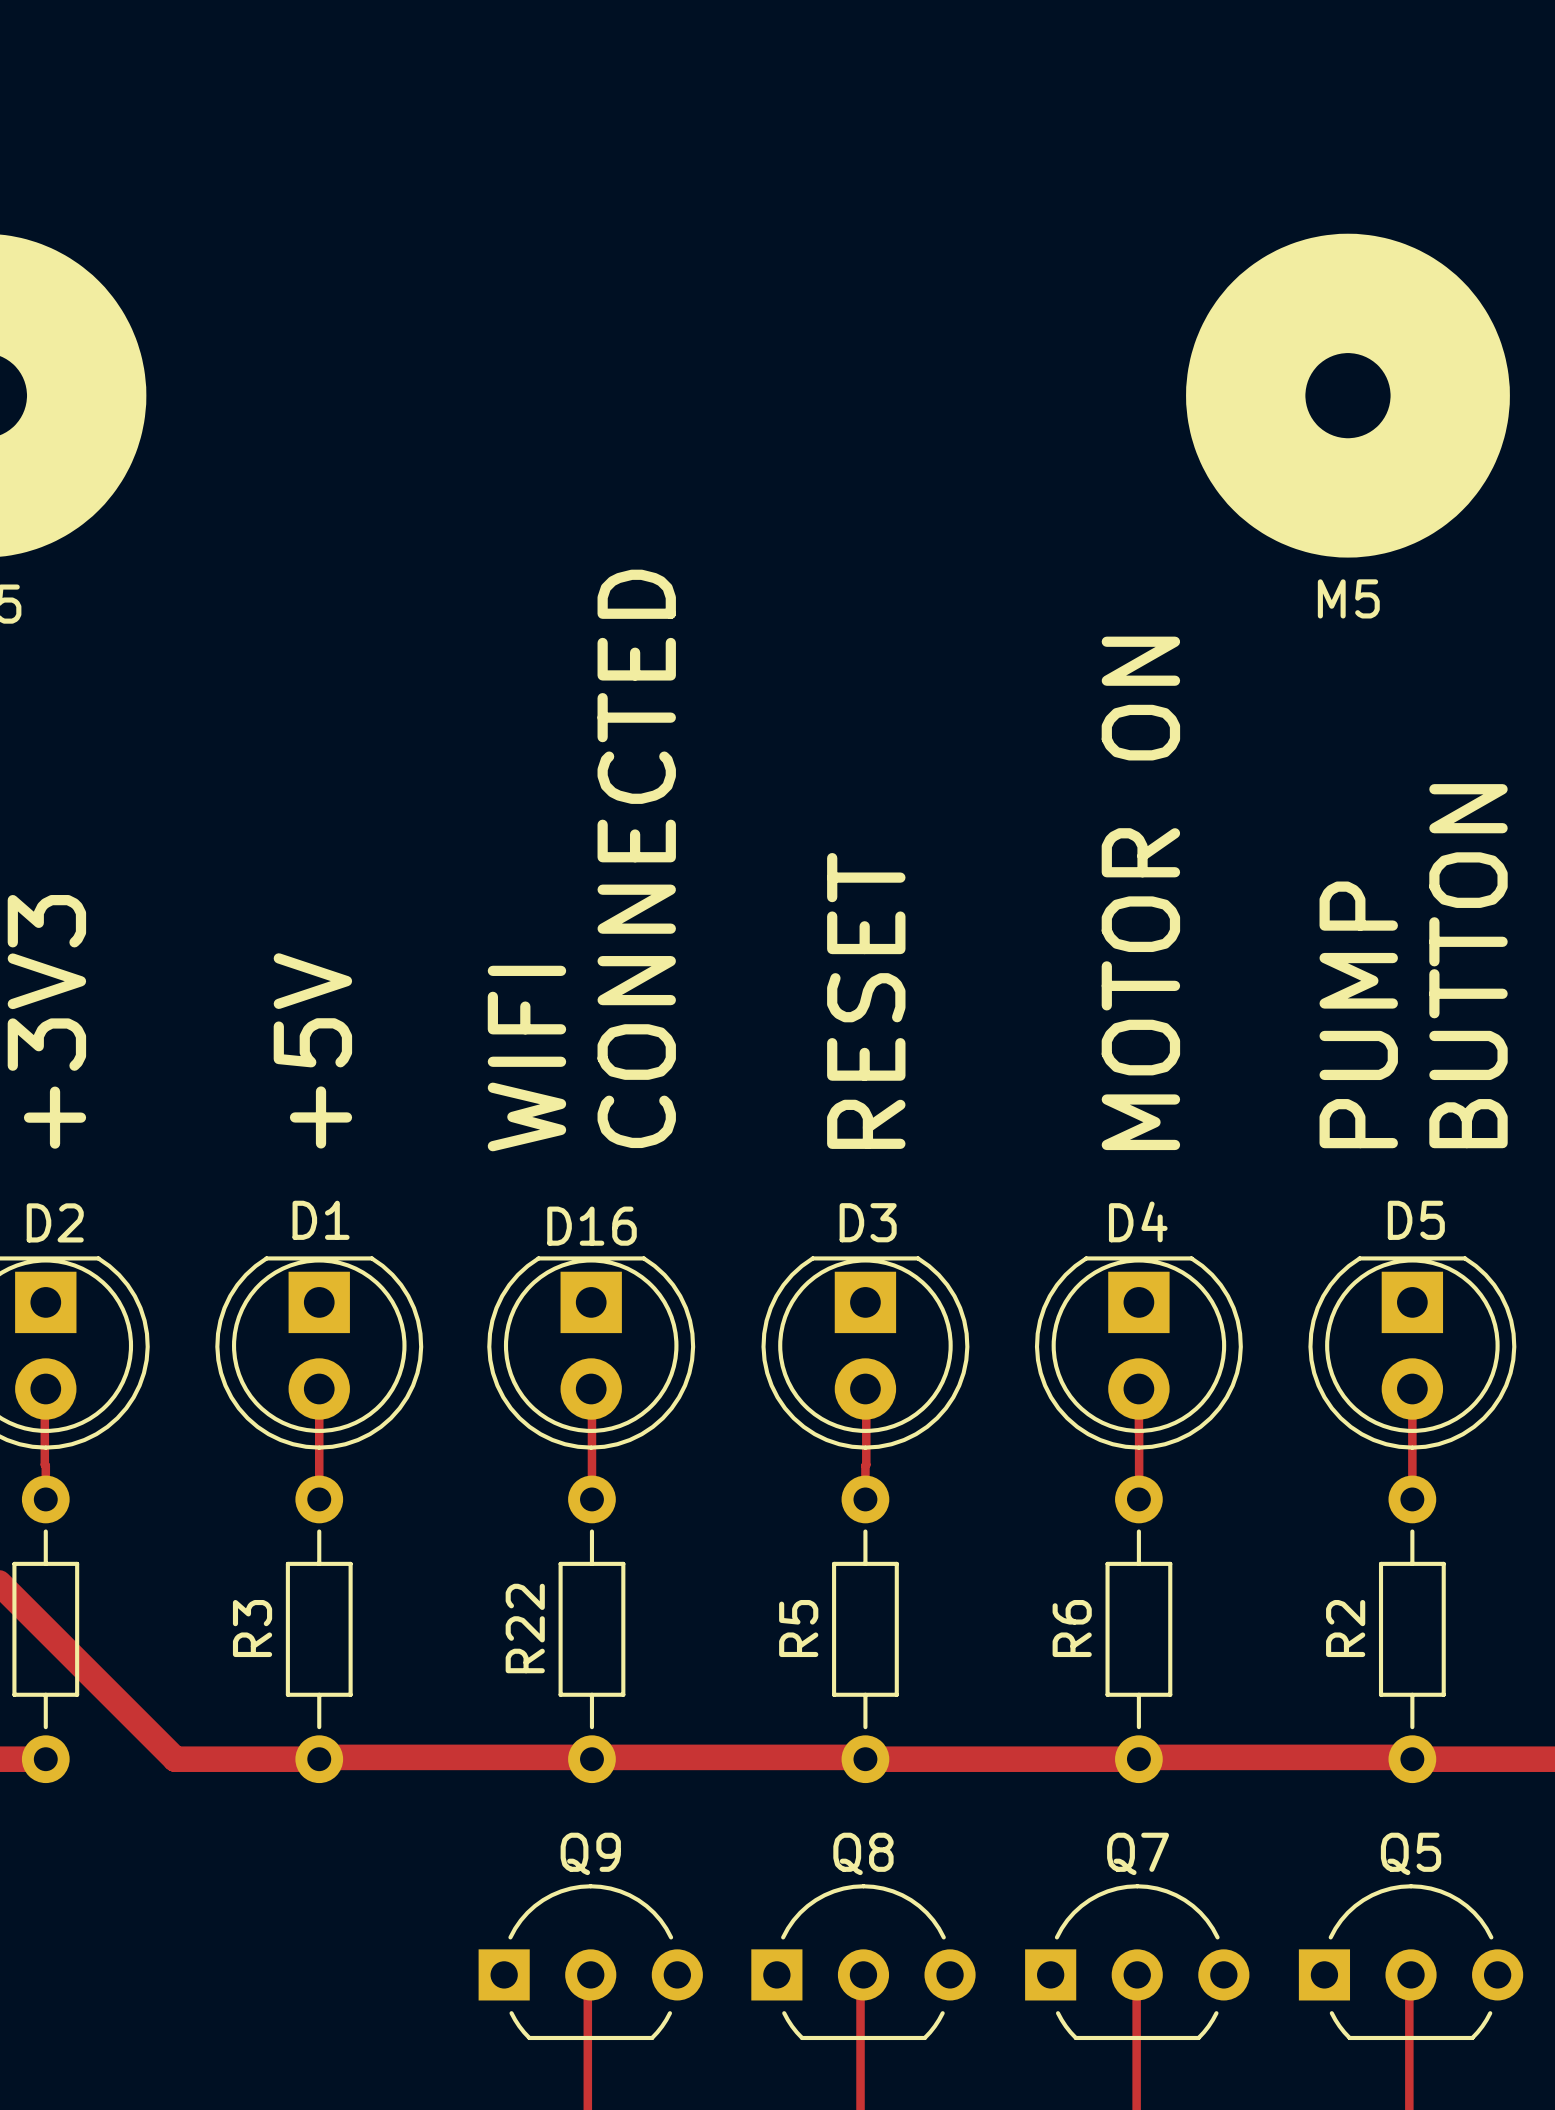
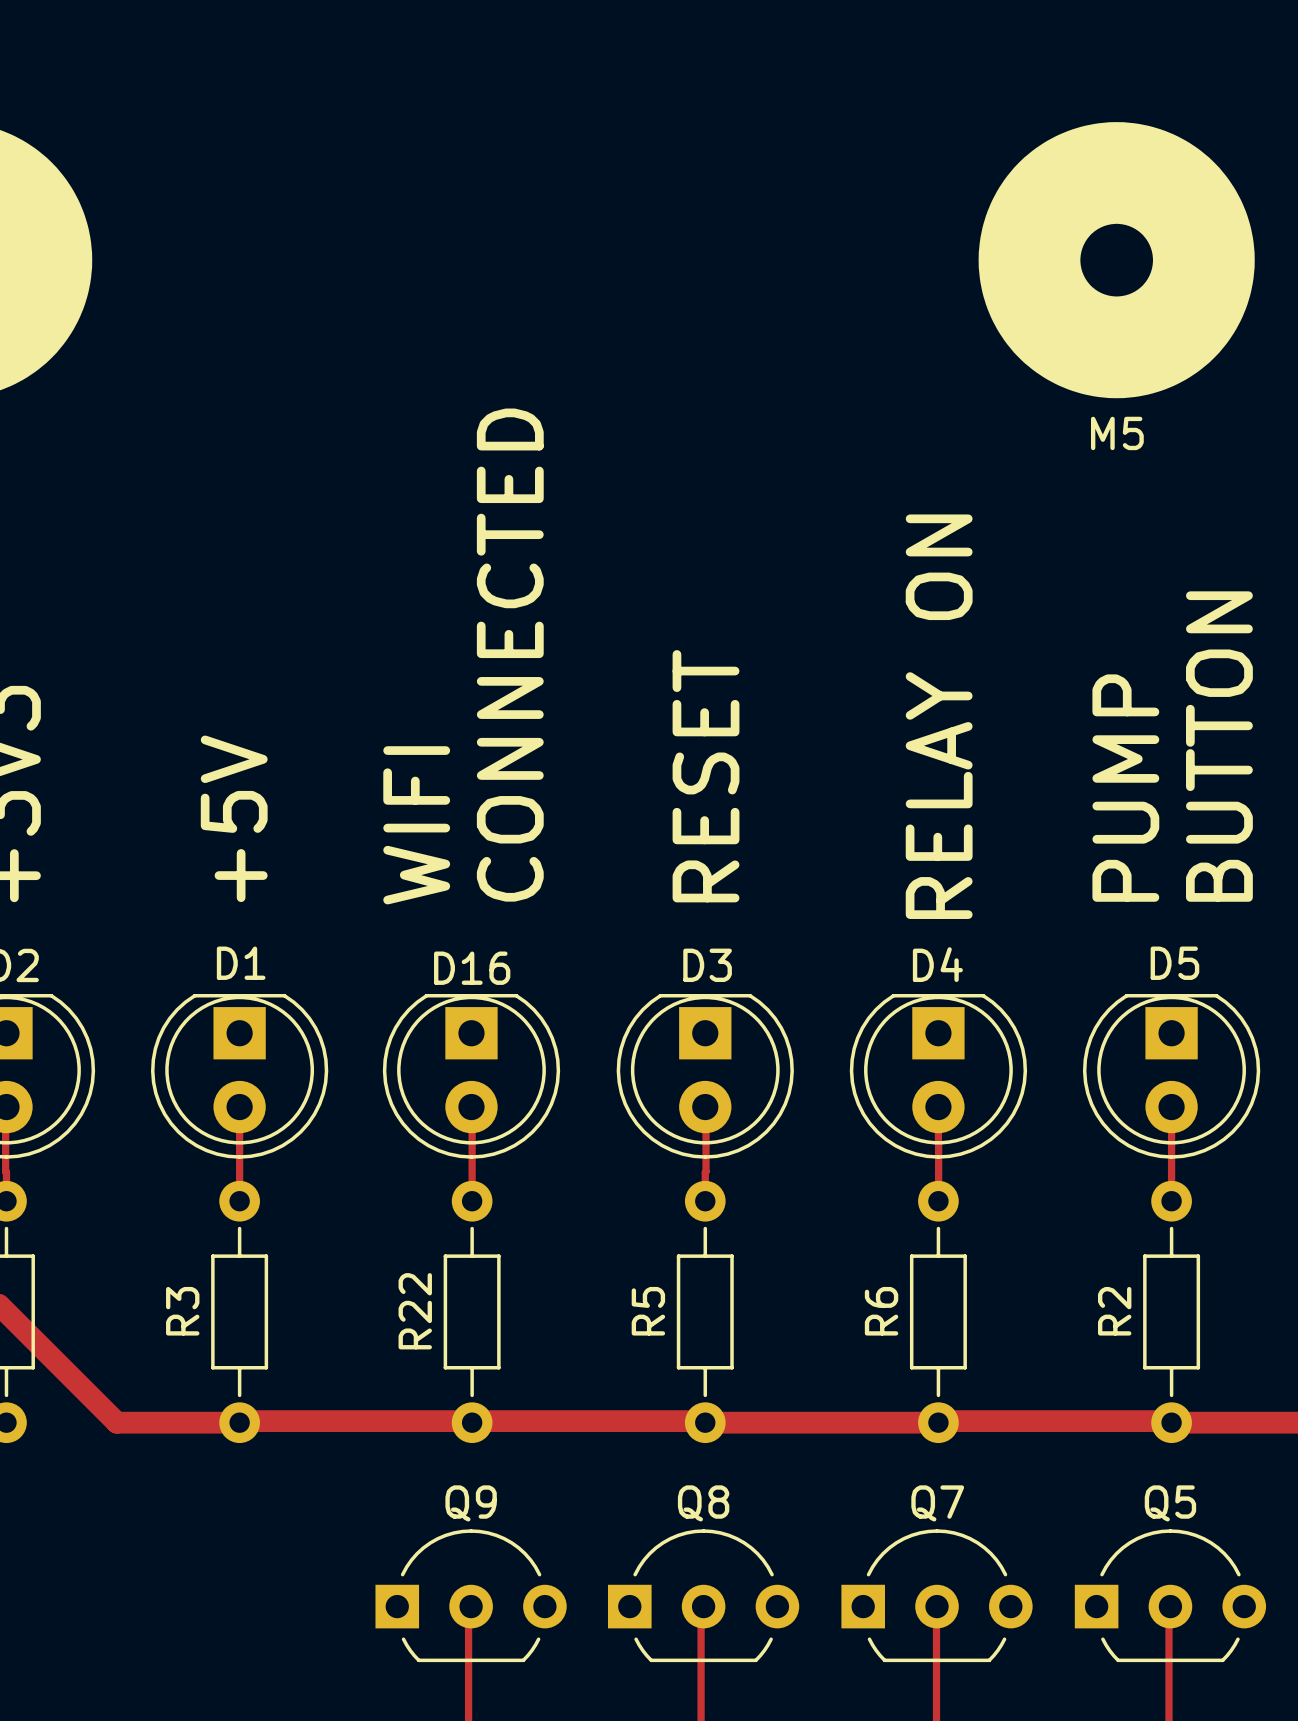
text: MOTOR ON (1140, 893) -> none
text: none -> RELAY ON (939, 716)

